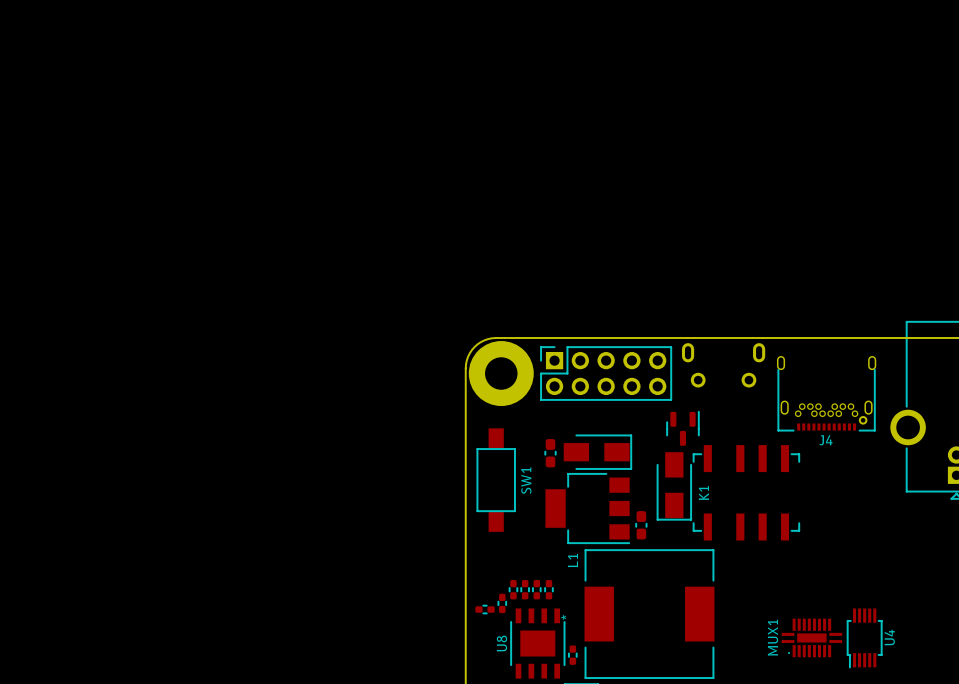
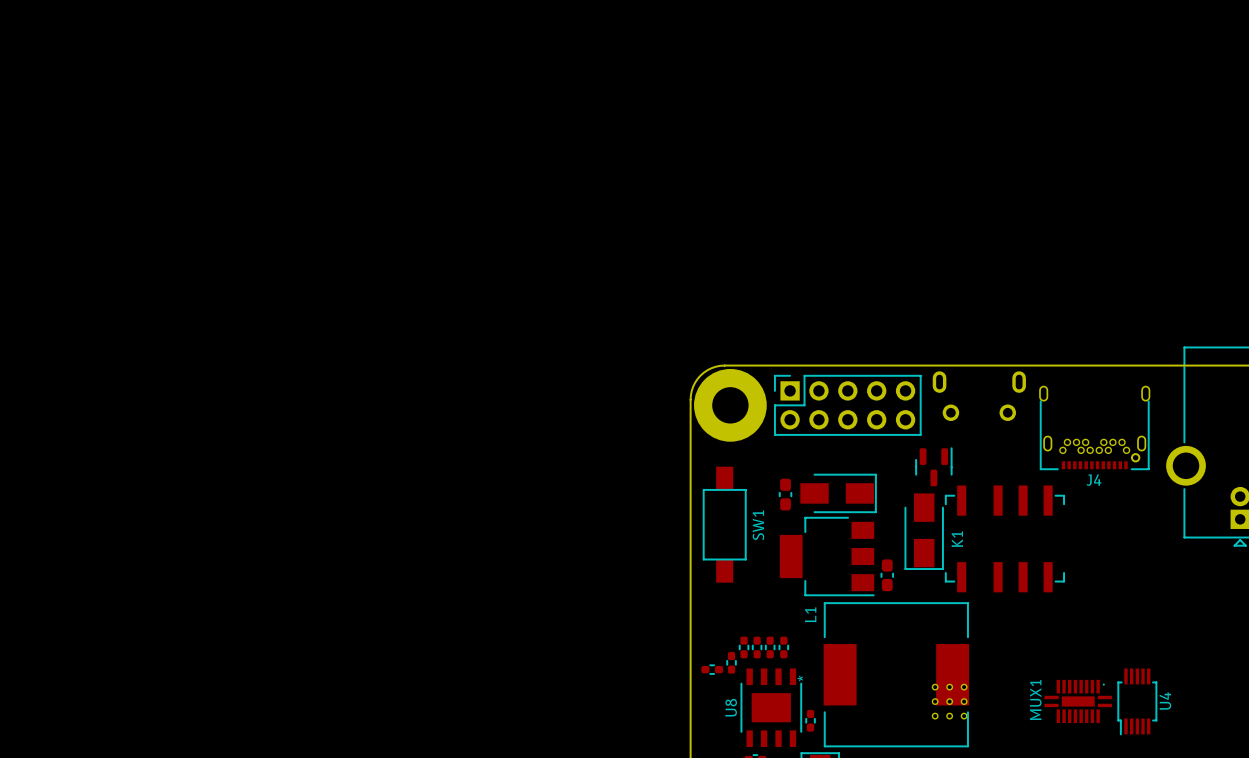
MUX1 rotation: 0° (811, 637) -> 180° (1078, 701)
part: none -> (949, 701)

